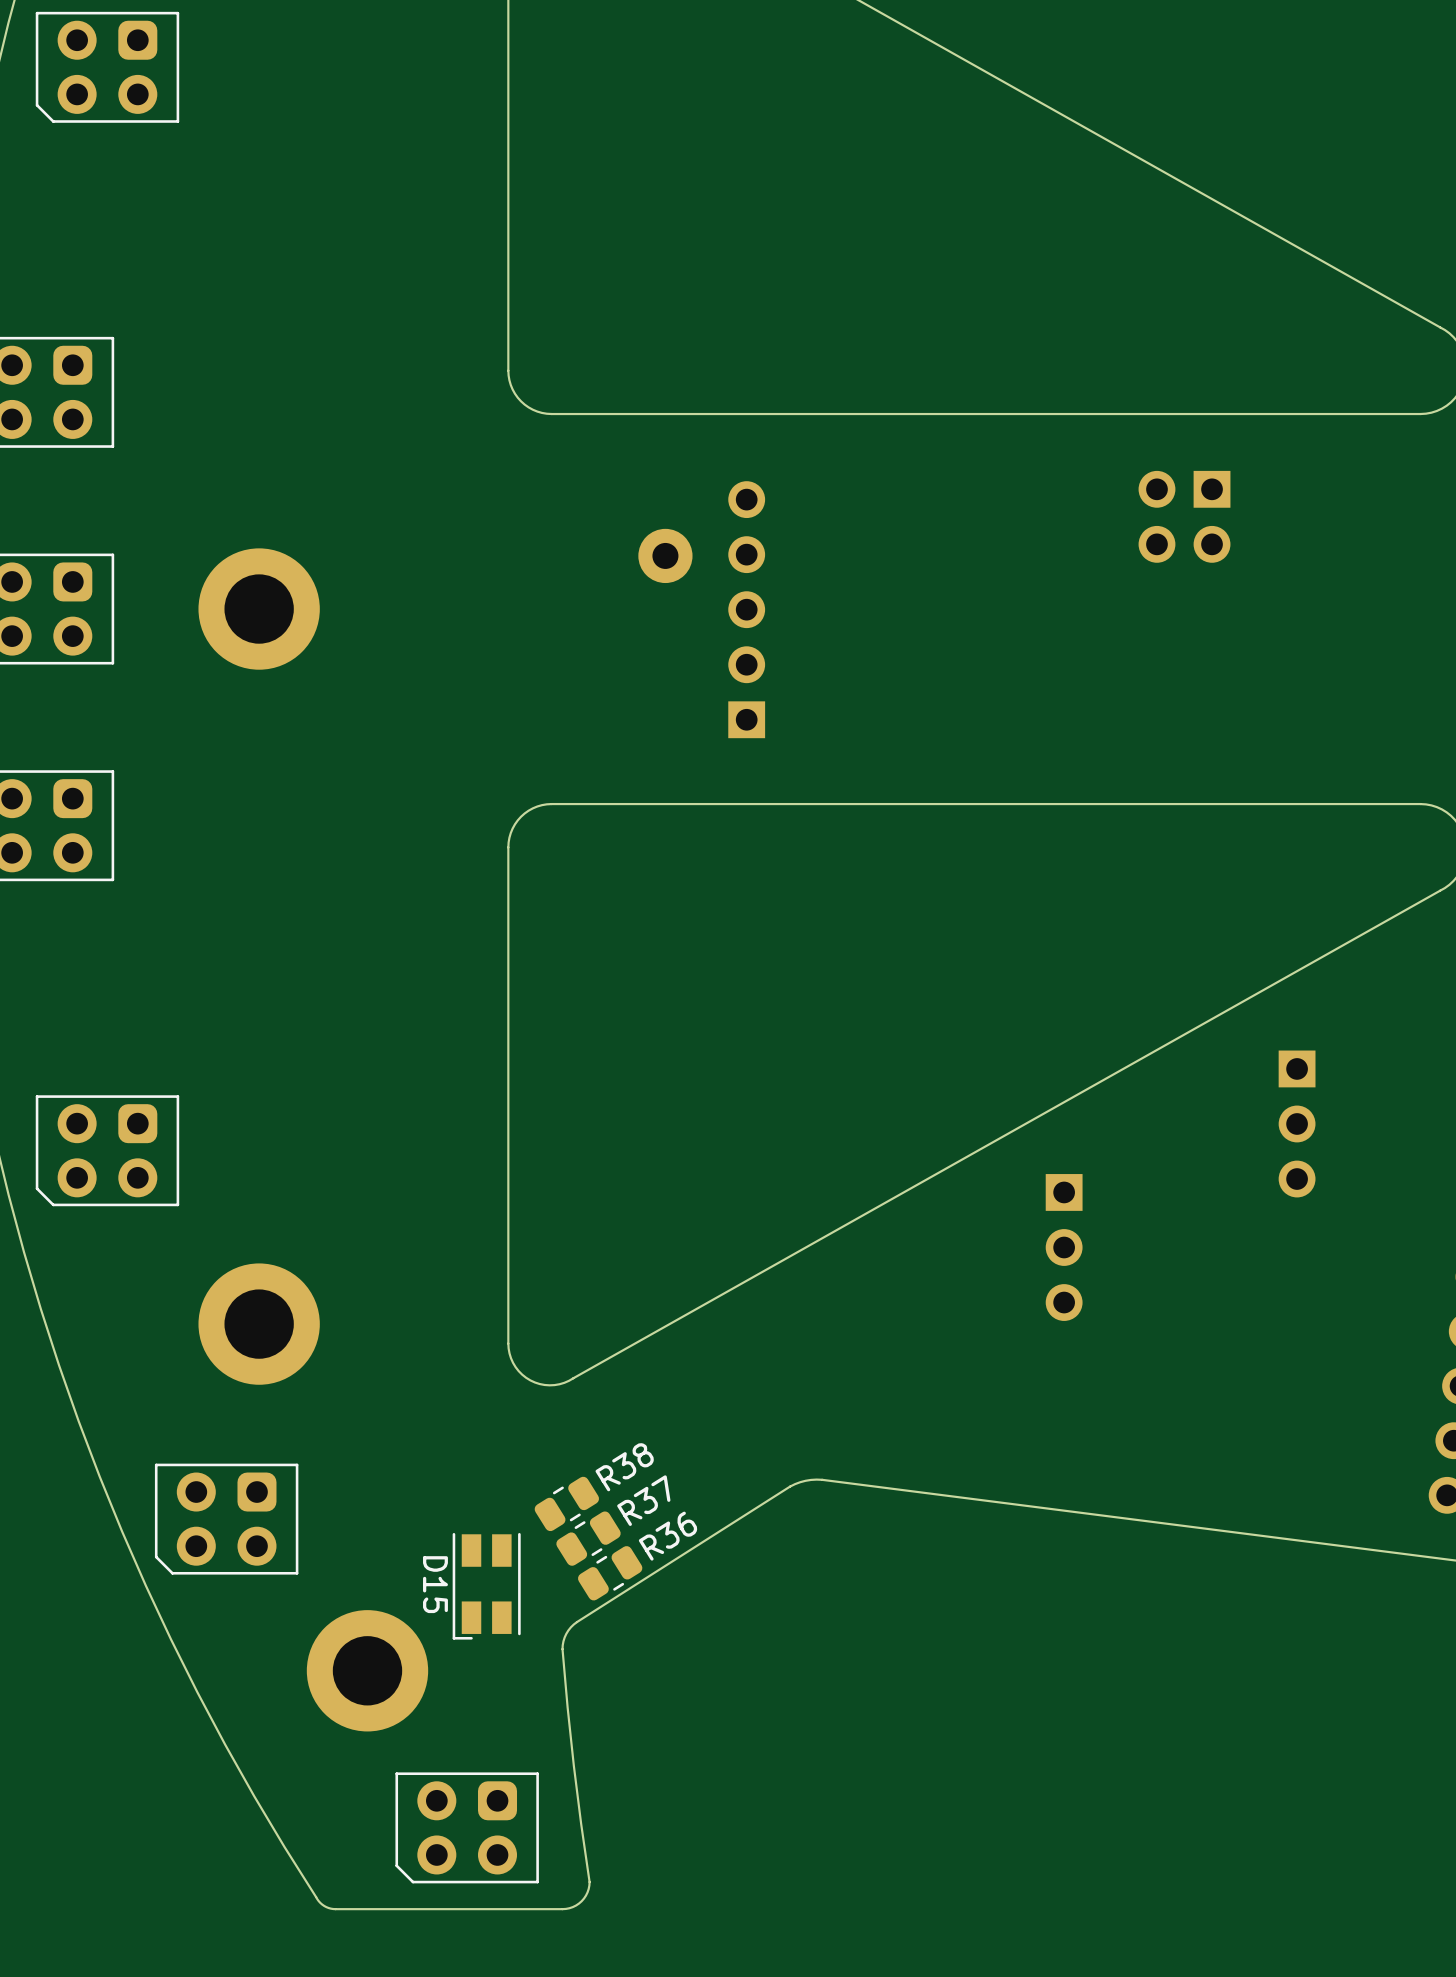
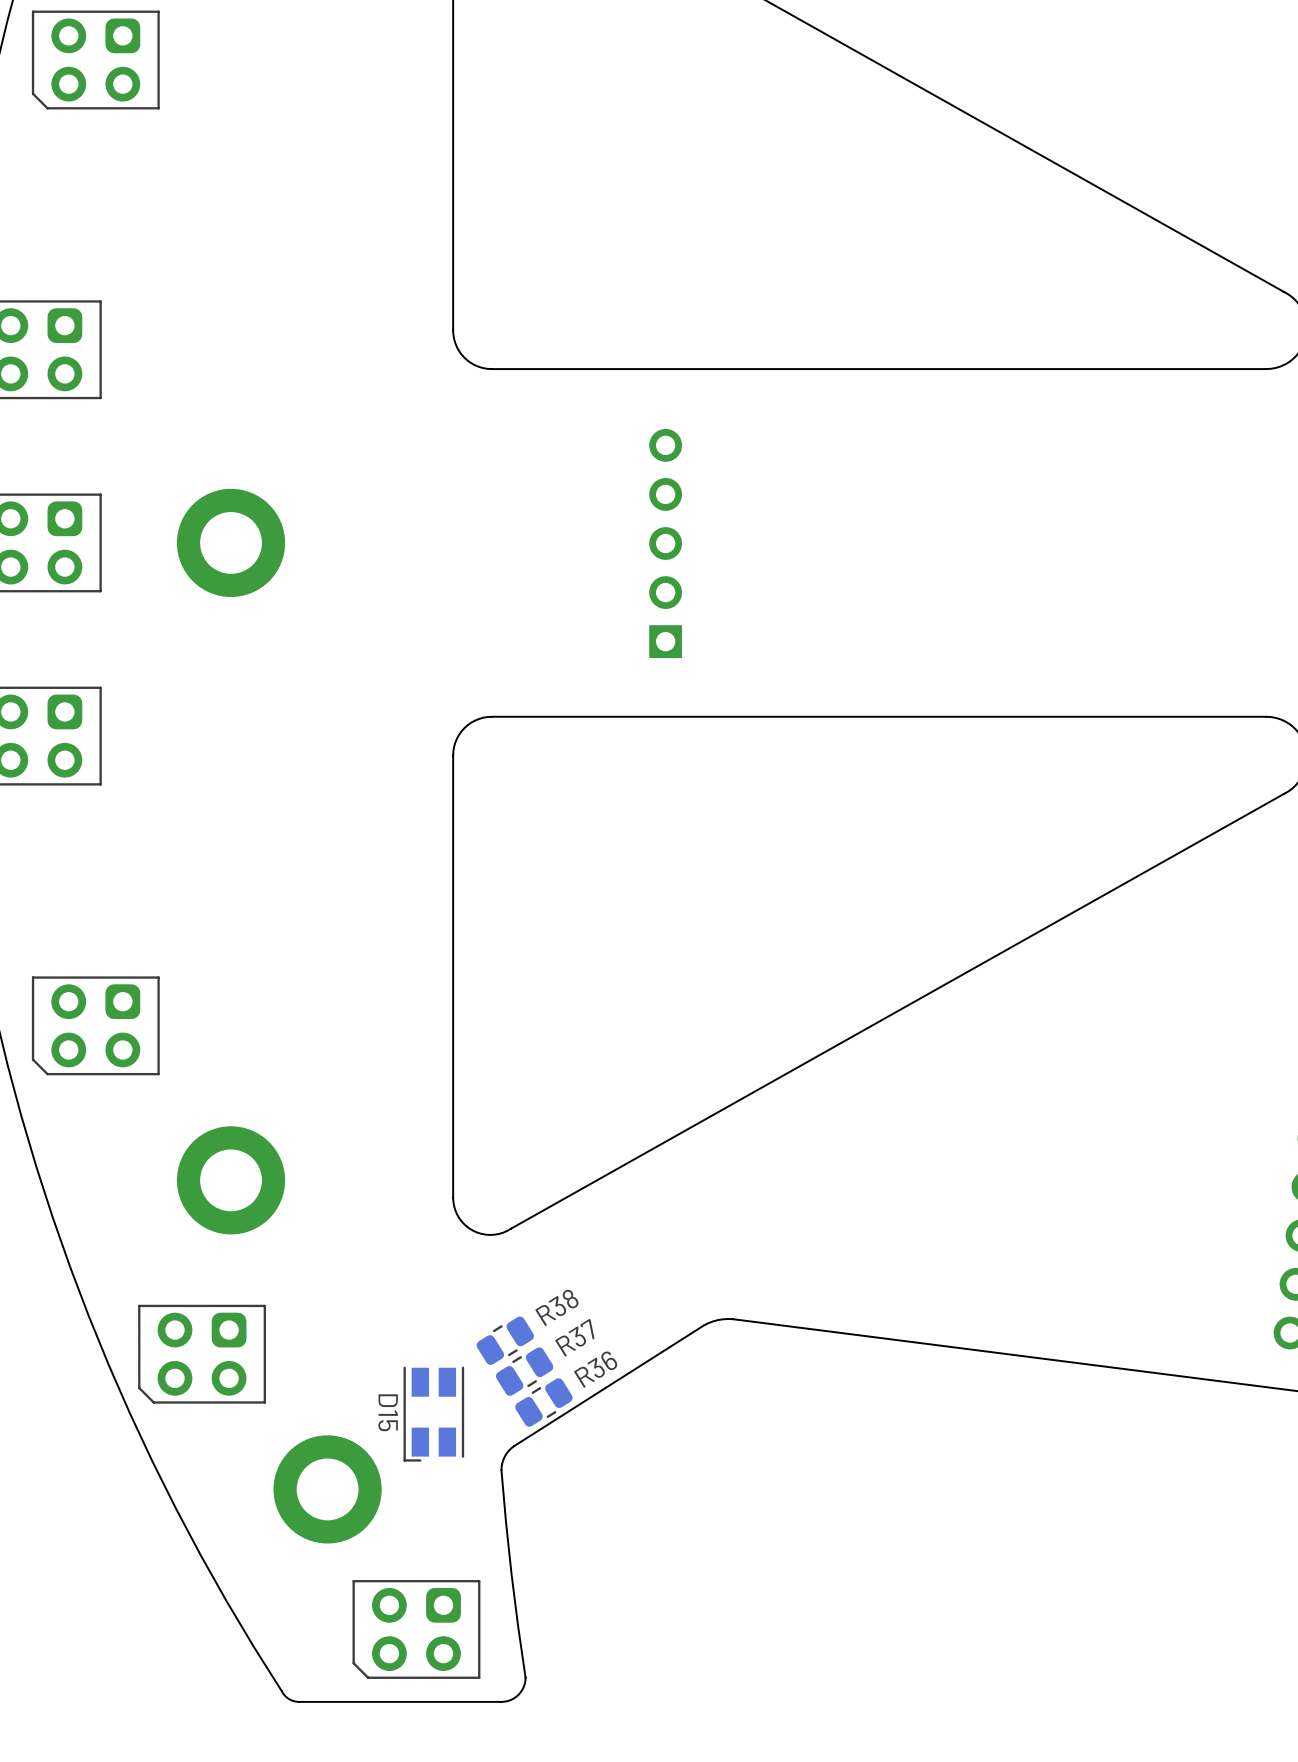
part: (1184, 516) -> none
part: (665, 555) -> none
part: (1297, 1123) -> none
part: (1064, 1247) -> none

